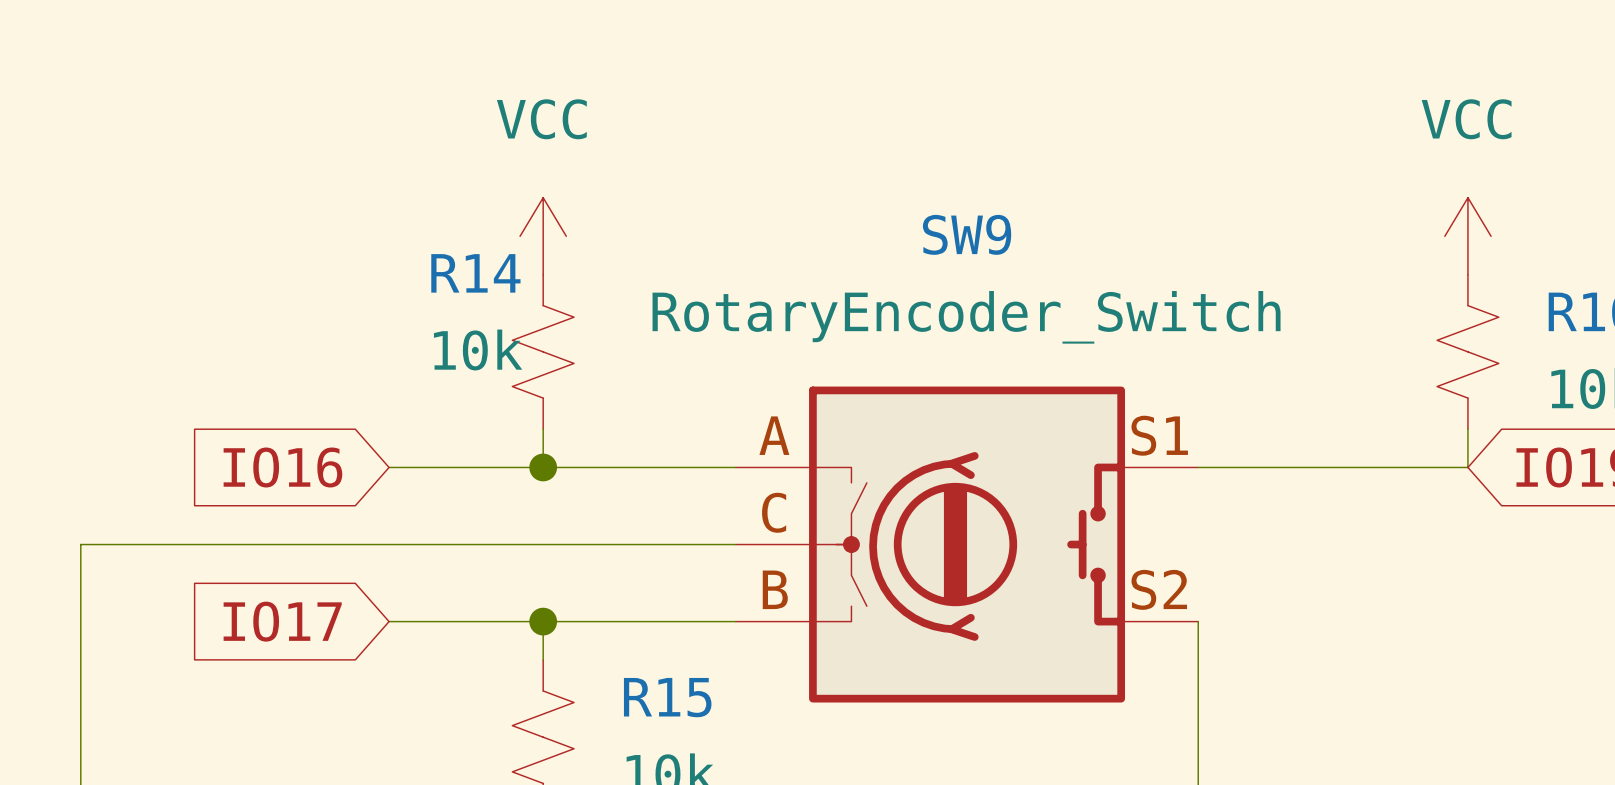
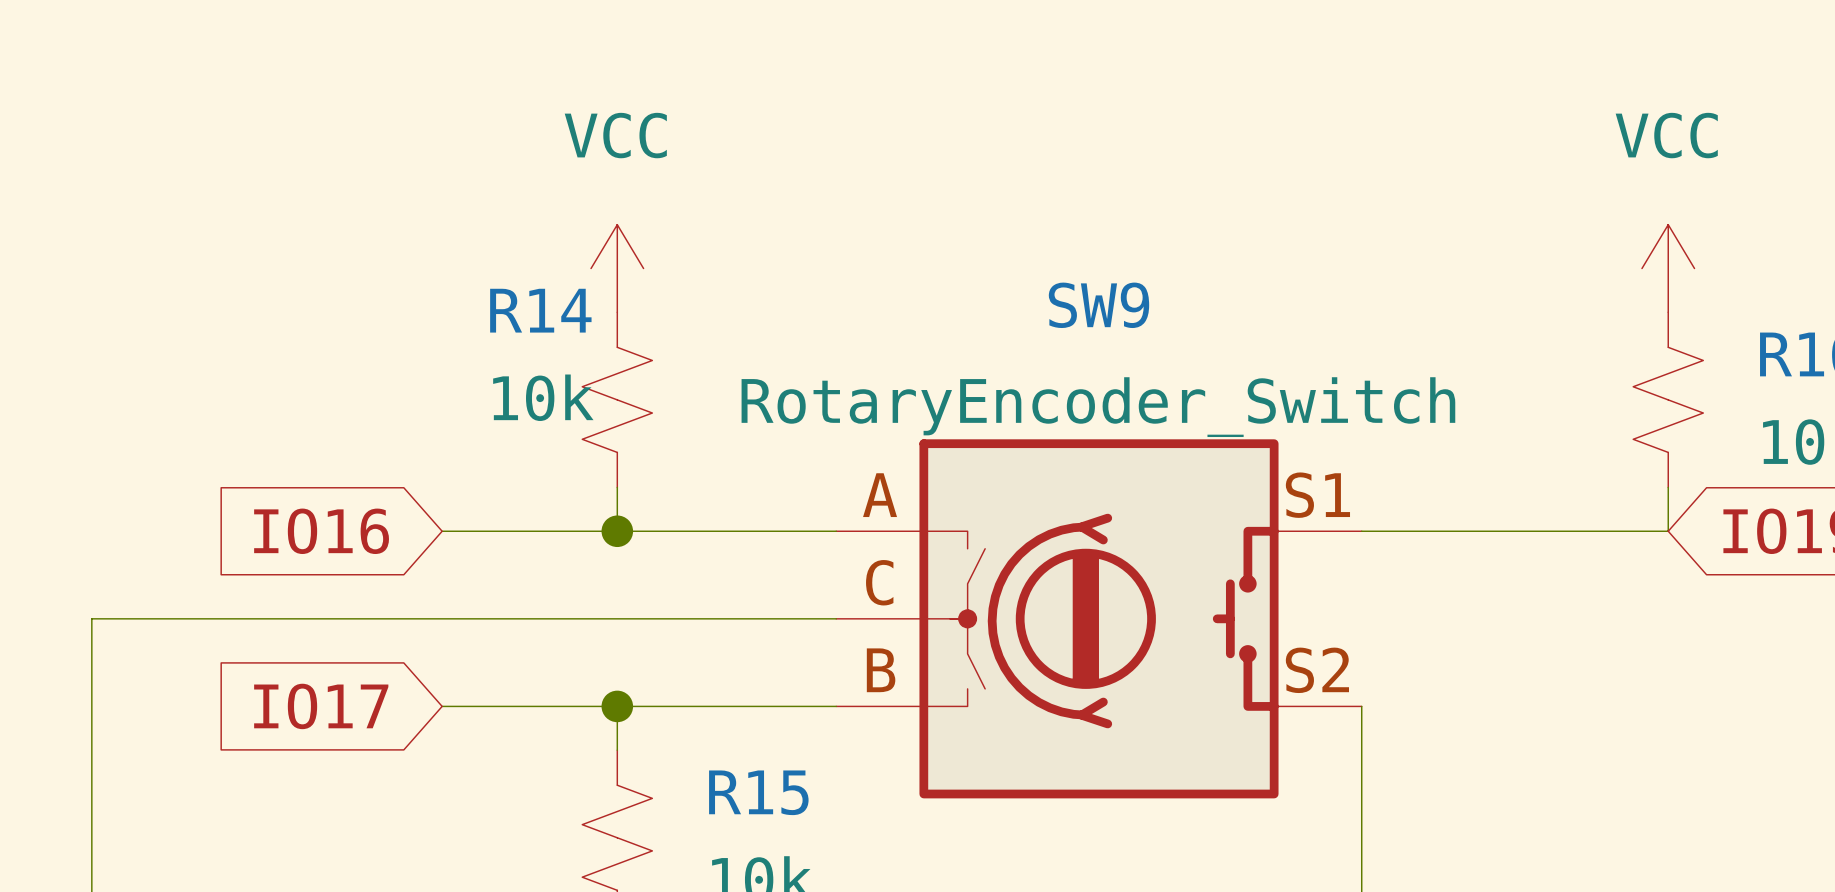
SW9 name position: SW9 (967, 234) -> SW9 (1098, 305)
SW9 value position: RotaryEncoder_Switch (966, 317) -> RotaryEncoder_Switch (1098, 407)

